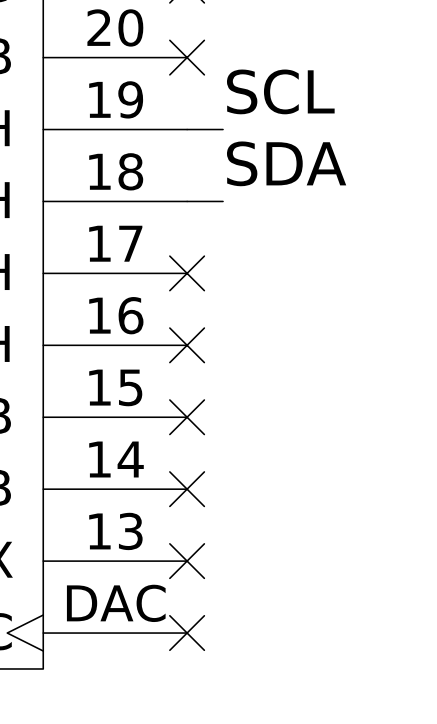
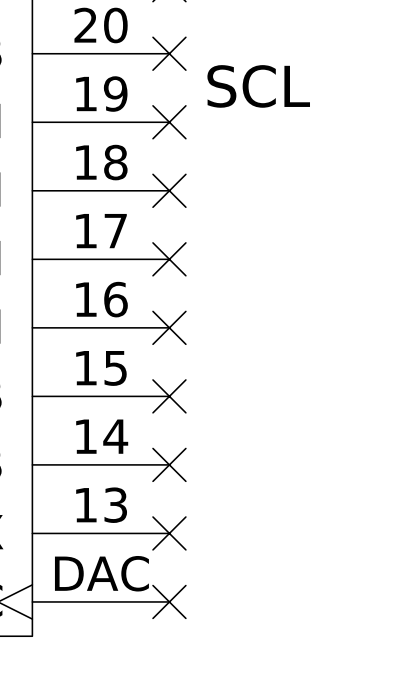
wire: (187, 129) (223, 129) -> none
no-connect mark: none -> (169, 122)
label: SDA (286, 163) -> none
wire: (187, 201) (223, 201) -> none
no-connect mark: none -> (169, 190)

